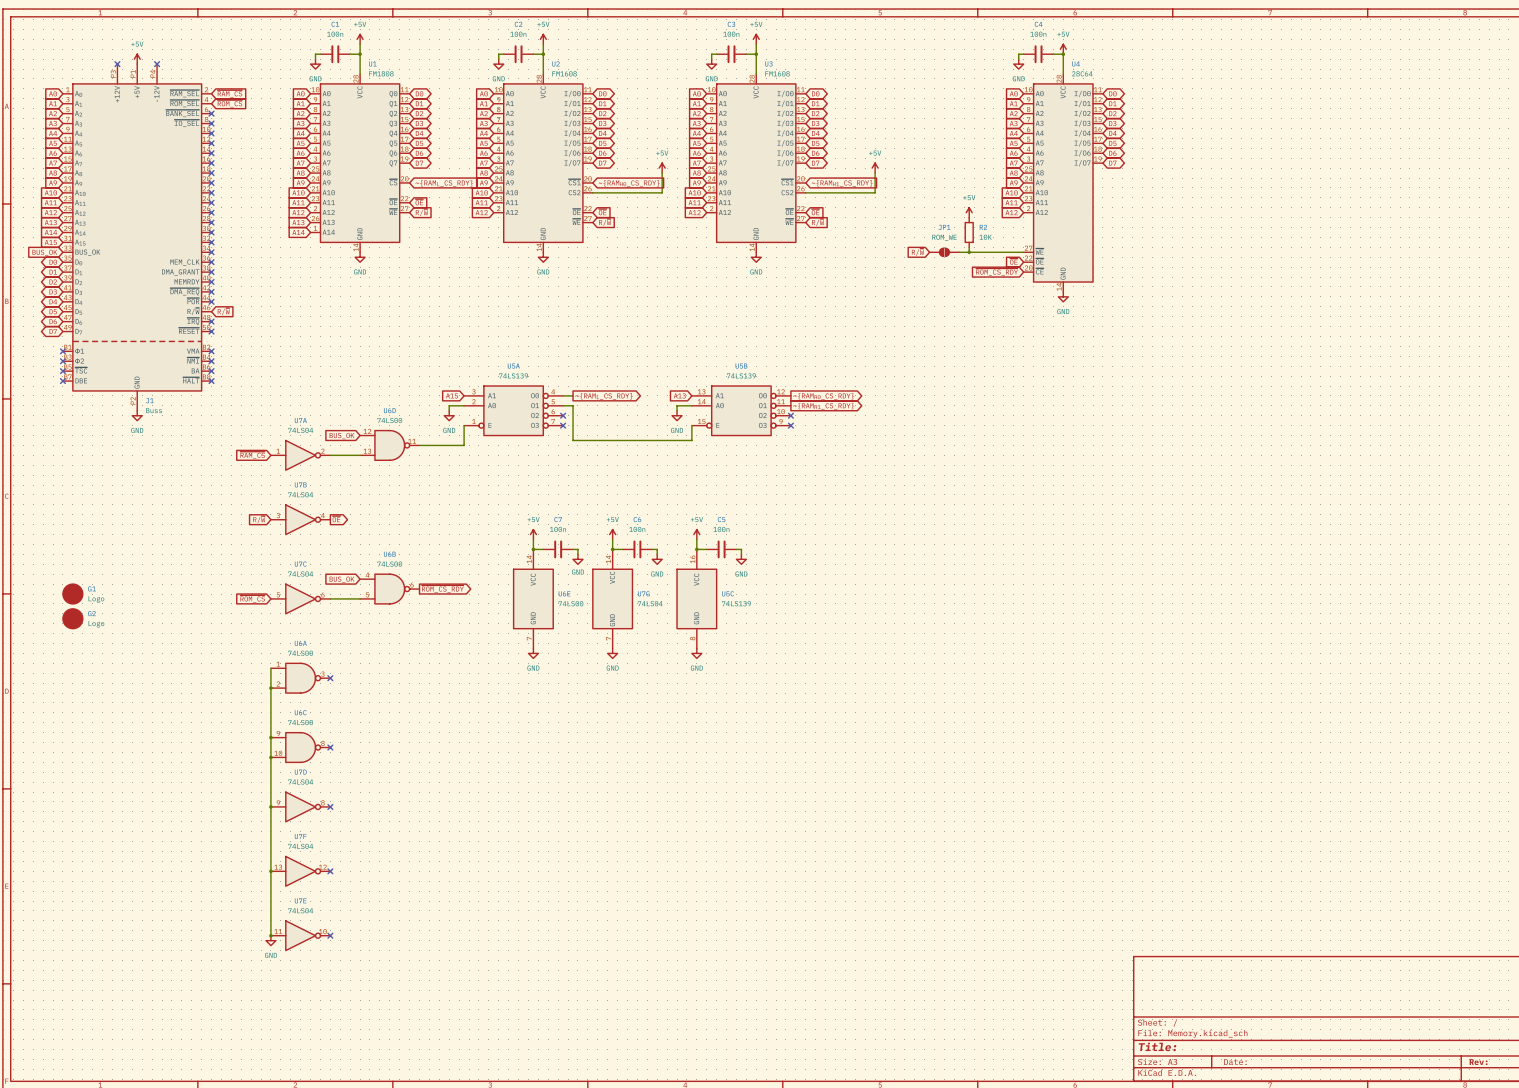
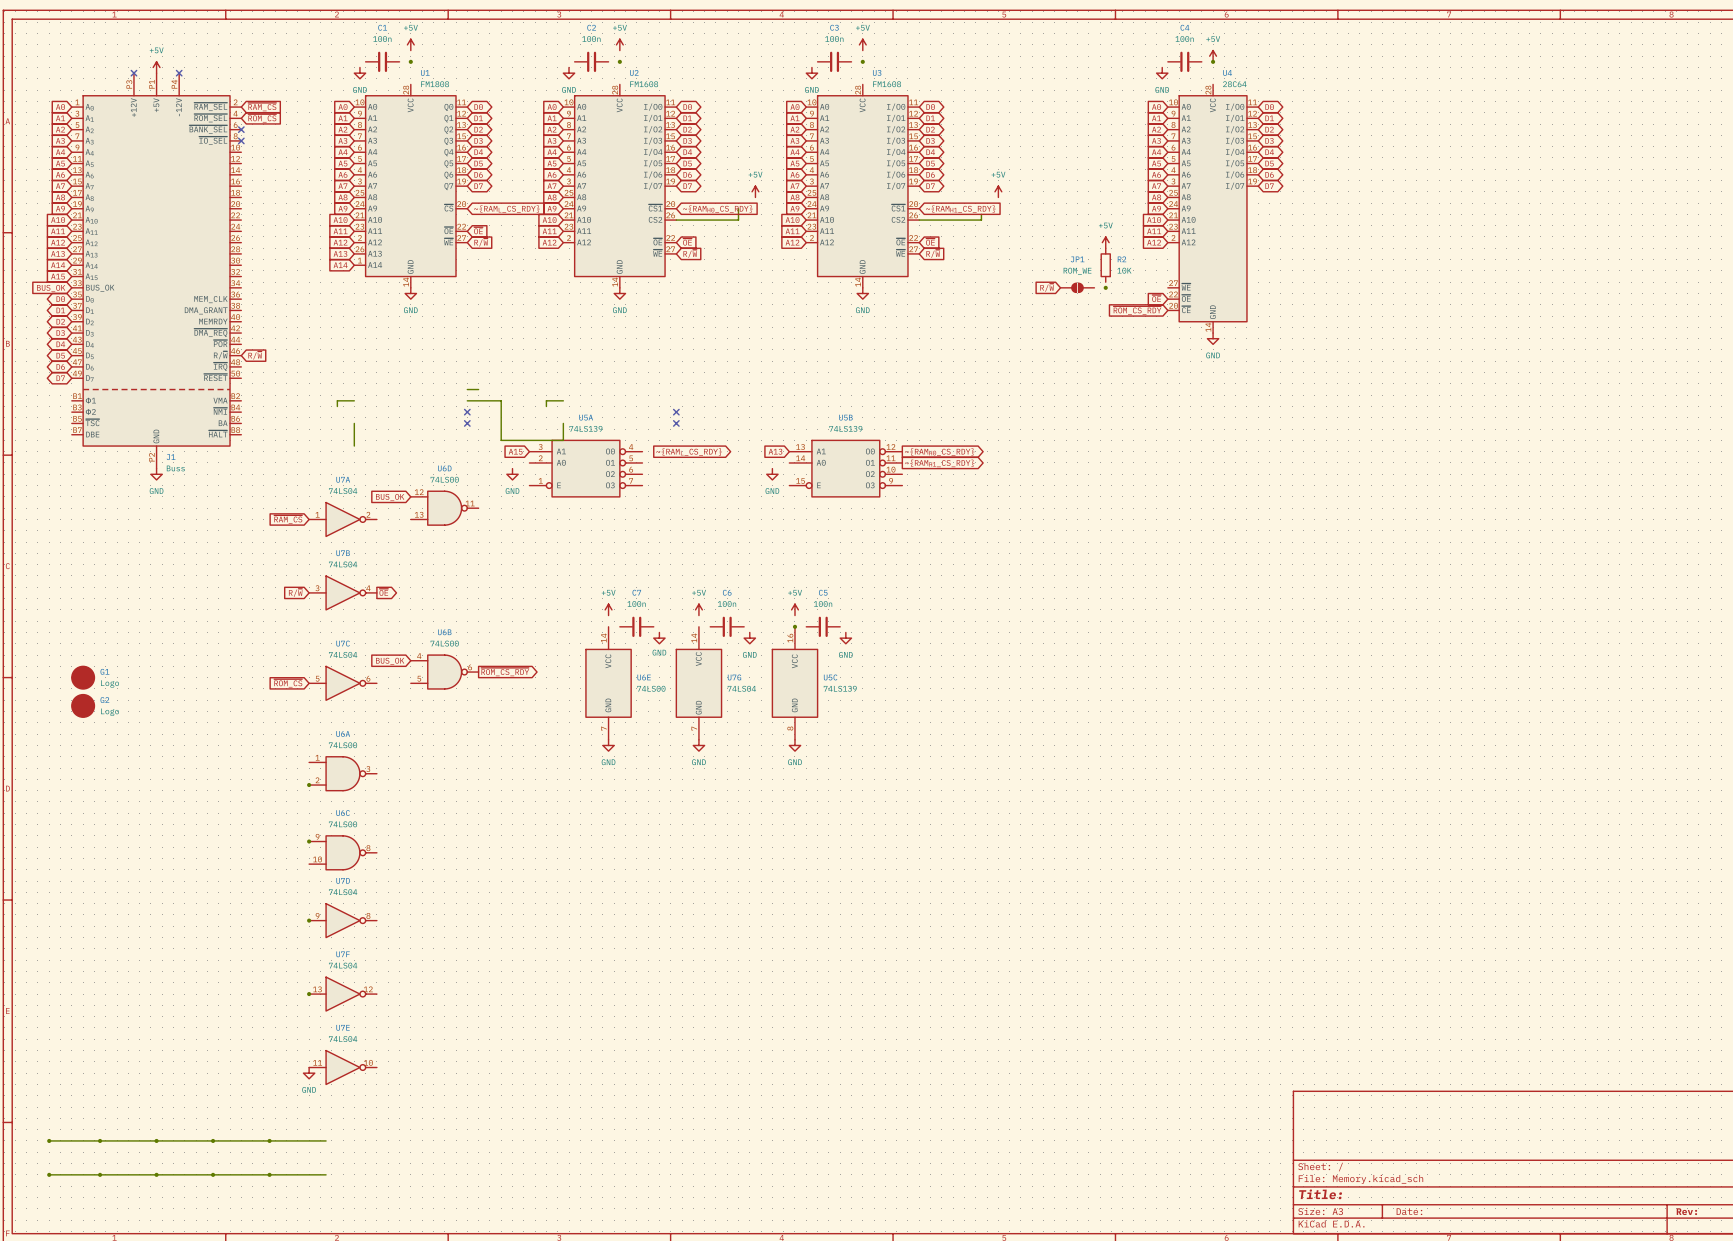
wire: (360, 44) (360, 74) -> none
wire: (543, 44) (543, 74) -> none
wire: (756, 44) (756, 74) -> none
wire: (320, 54) (315, 54) (315, 59) -> none
wire: (350, 54) (360, 54) -> none
wire: (503, 54) (498, 54) (498, 59) -> none
wire: (533, 54) (543, 54) -> none
wire: (716, 54) (711, 54) (711, 59) -> none
wire: (746, 54) (756, 54) -> none
wire: (1023, 54) (1018, 54) (1018, 59) -> none
wire: (1053, 54) (1063, 54) (1063, 74) -> none
no-connect mark: (211, 133) -> none
no-connect mark: (211, 143) -> none
no-connect mark: (211, 153) -> none
no-connect mark: (211, 163) -> none
no-connect mark: (211, 173) -> none
wire: (662, 173) (662, 192) (647, 192) -> (738, 208) (738, 220)
wire: (875, 173) (875, 192) (860, 192) -> (981, 214) (981, 220)
no-connect mark: (211, 182) -> none
no-connect mark: (211, 192) -> none
no-connect mark: (211, 202) -> none
no-connect mark: (211, 212) -> none
no-connect mark: (211, 222) -> none
no-connect mark: (211, 232) -> none
no-connect mark: (211, 242) -> none
wire: (969, 247) (969, 252) -> none
no-connect mark: (211, 252) -> none
wire: (959, 252) (1023, 252) -> none
no-connect mark: (211, 262) -> none
no-connect mark: (211, 272) -> none
no-connect mark: (211, 282) -> none
no-connect mark: (211, 291) -> none
no-connect mark: (211, 301) -> none
no-connect mark: (211, 321) -> none
no-connect mark: (211, 331) -> none
wire: none -> (467, 389) (478, 389)
no-connect mark: (62, 351) -> none
no-connect mark: (211, 351) -> none
wire: none -> (354, 400) (337, 400) (337, 406)
wire: none -> (467, 400) (501, 400) (501, 440) (563, 440) (563, 423)
no-connect mark: (62, 361) -> none
no-connect mark: (211, 361) -> none
no-connect mark: none -> (467, 412)
no-connect mark: none -> (676, 412)
no-connect mark: (62, 371) -> none
no-connect mark: (211, 371) -> none
wire: none -> (354, 423) (354, 446)
no-connect mark: none -> (467, 423)
no-connect mark: none -> (676, 423)
no-connect mark: (62, 381) -> none
no-connect mark: (211, 381) -> none
wire: (563, 395) (573, 395) -> none
wire: (464, 405) (449, 405) (449, 410) -> (563, 400) (546, 400) (546, 406)
wire: (563, 405) (573, 405) (573, 440) (691, 440) (691, 425) -> none
wire: (691, 405) (677, 405) (677, 410) -> none
no-connect mark: (563, 415) -> none
no-connect mark: (790, 415) -> none
wire: (464, 425) (464, 445) (419, 445) -> none
no-connect mark: (563, 425) -> none
no-connect mark: (790, 425) -> none
wire: (330, 455) (360, 455) -> none
wire: (533, 539) (533, 549) (543, 549) -> none
wire: (612, 539) (612, 549) (622, 549) -> none
wire: (696, 539) (696, 549) (706, 549) -> none
junction: (533, 549) -> none
wire: (573, 549) (577, 549) (577, 554) -> none
junction: (612, 549) -> none
wire: (652, 549) (657, 549) (657, 554) -> none
wire: (736, 549) (741, 549) (741, 554) -> none
wire: (330, 598) (360, 598) -> none
wire: (270, 668) (270, 935) -> none
no-connect mark: (330, 678) -> none
no-connect mark: (330, 747) -> none
junction: (270, 757) -> none
no-connect mark: (330, 806) -> none
no-connect mark: (330, 871) -> none
junction: (270, 935) -> none
no-connect mark: (330, 935) -> none
wire: none -> (49, 1140) (326, 1140)
junction: none -> (49, 1140)
junction: none -> (100, 1140)
junction: none -> (156, 1140)
junction: none -> (213, 1140)
junction: none -> (269, 1140)
wire: none -> (49, 1174) (326, 1174)
junction: none -> (49, 1174)
junction: none -> (100, 1174)
junction: none -> (156, 1174)
junction: none -> (213, 1174)
junction: none -> (269, 1174)

